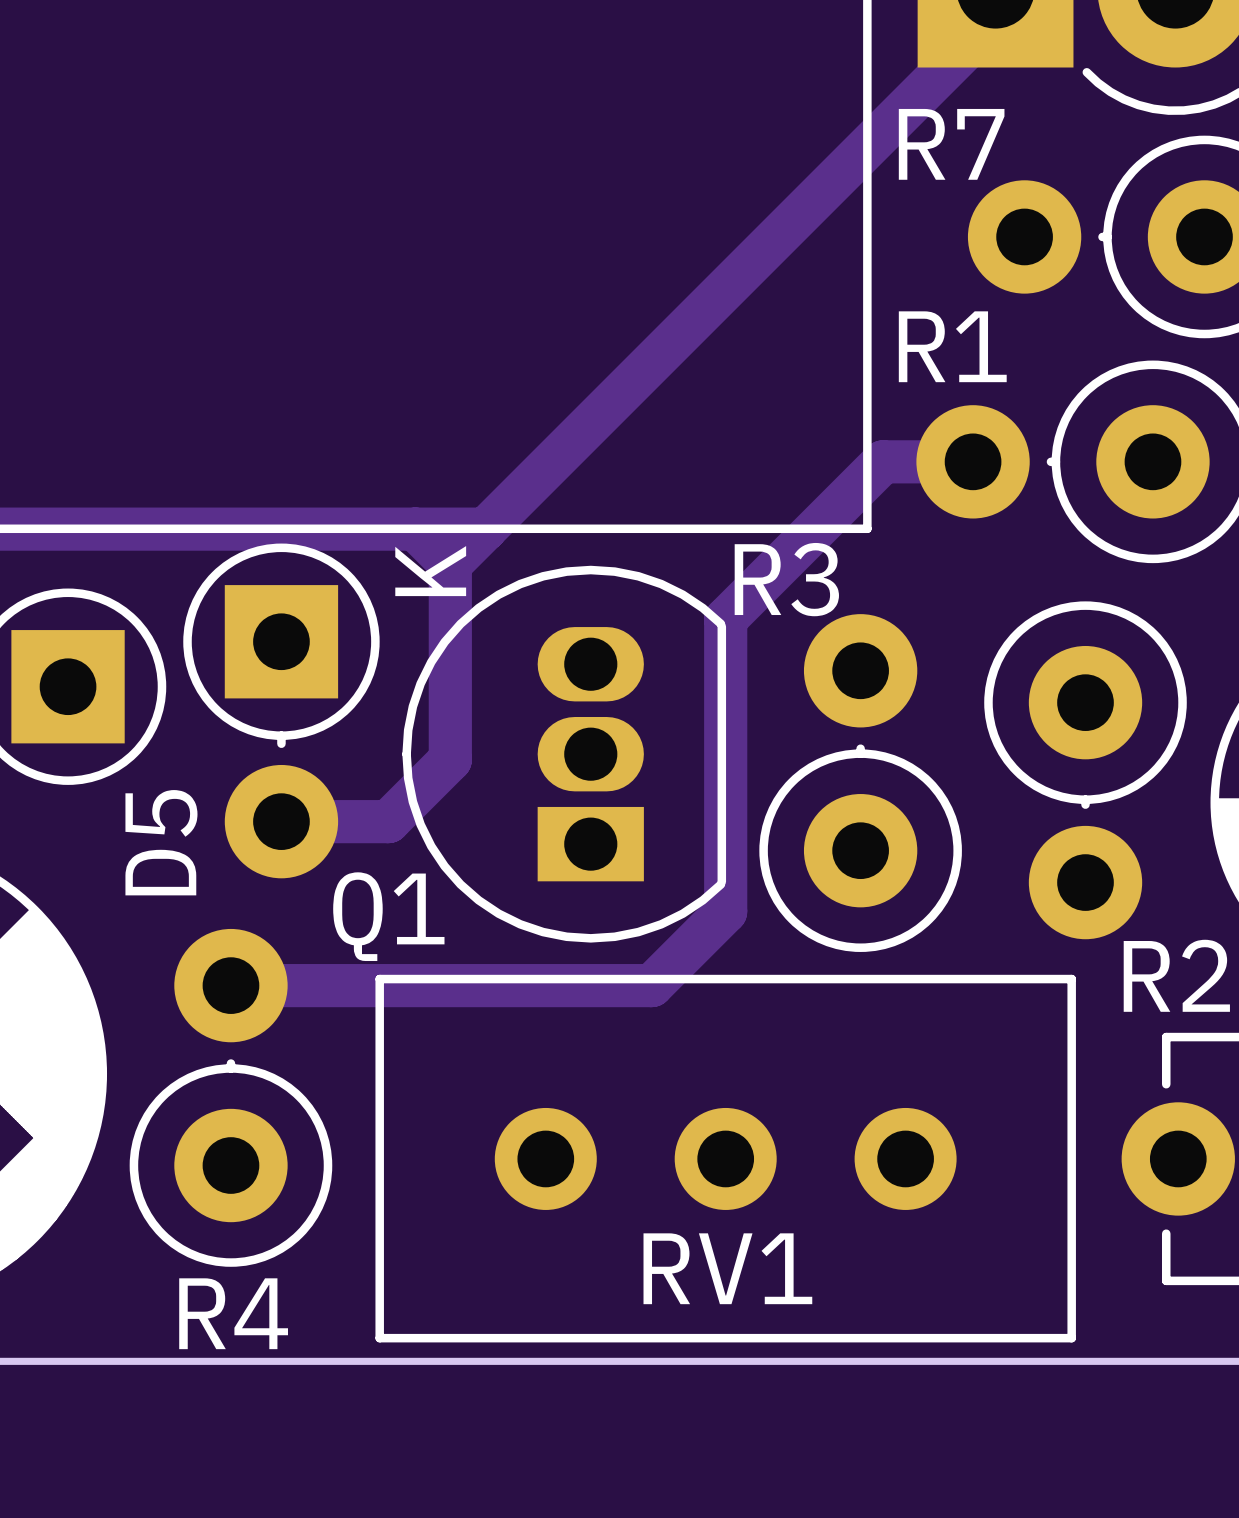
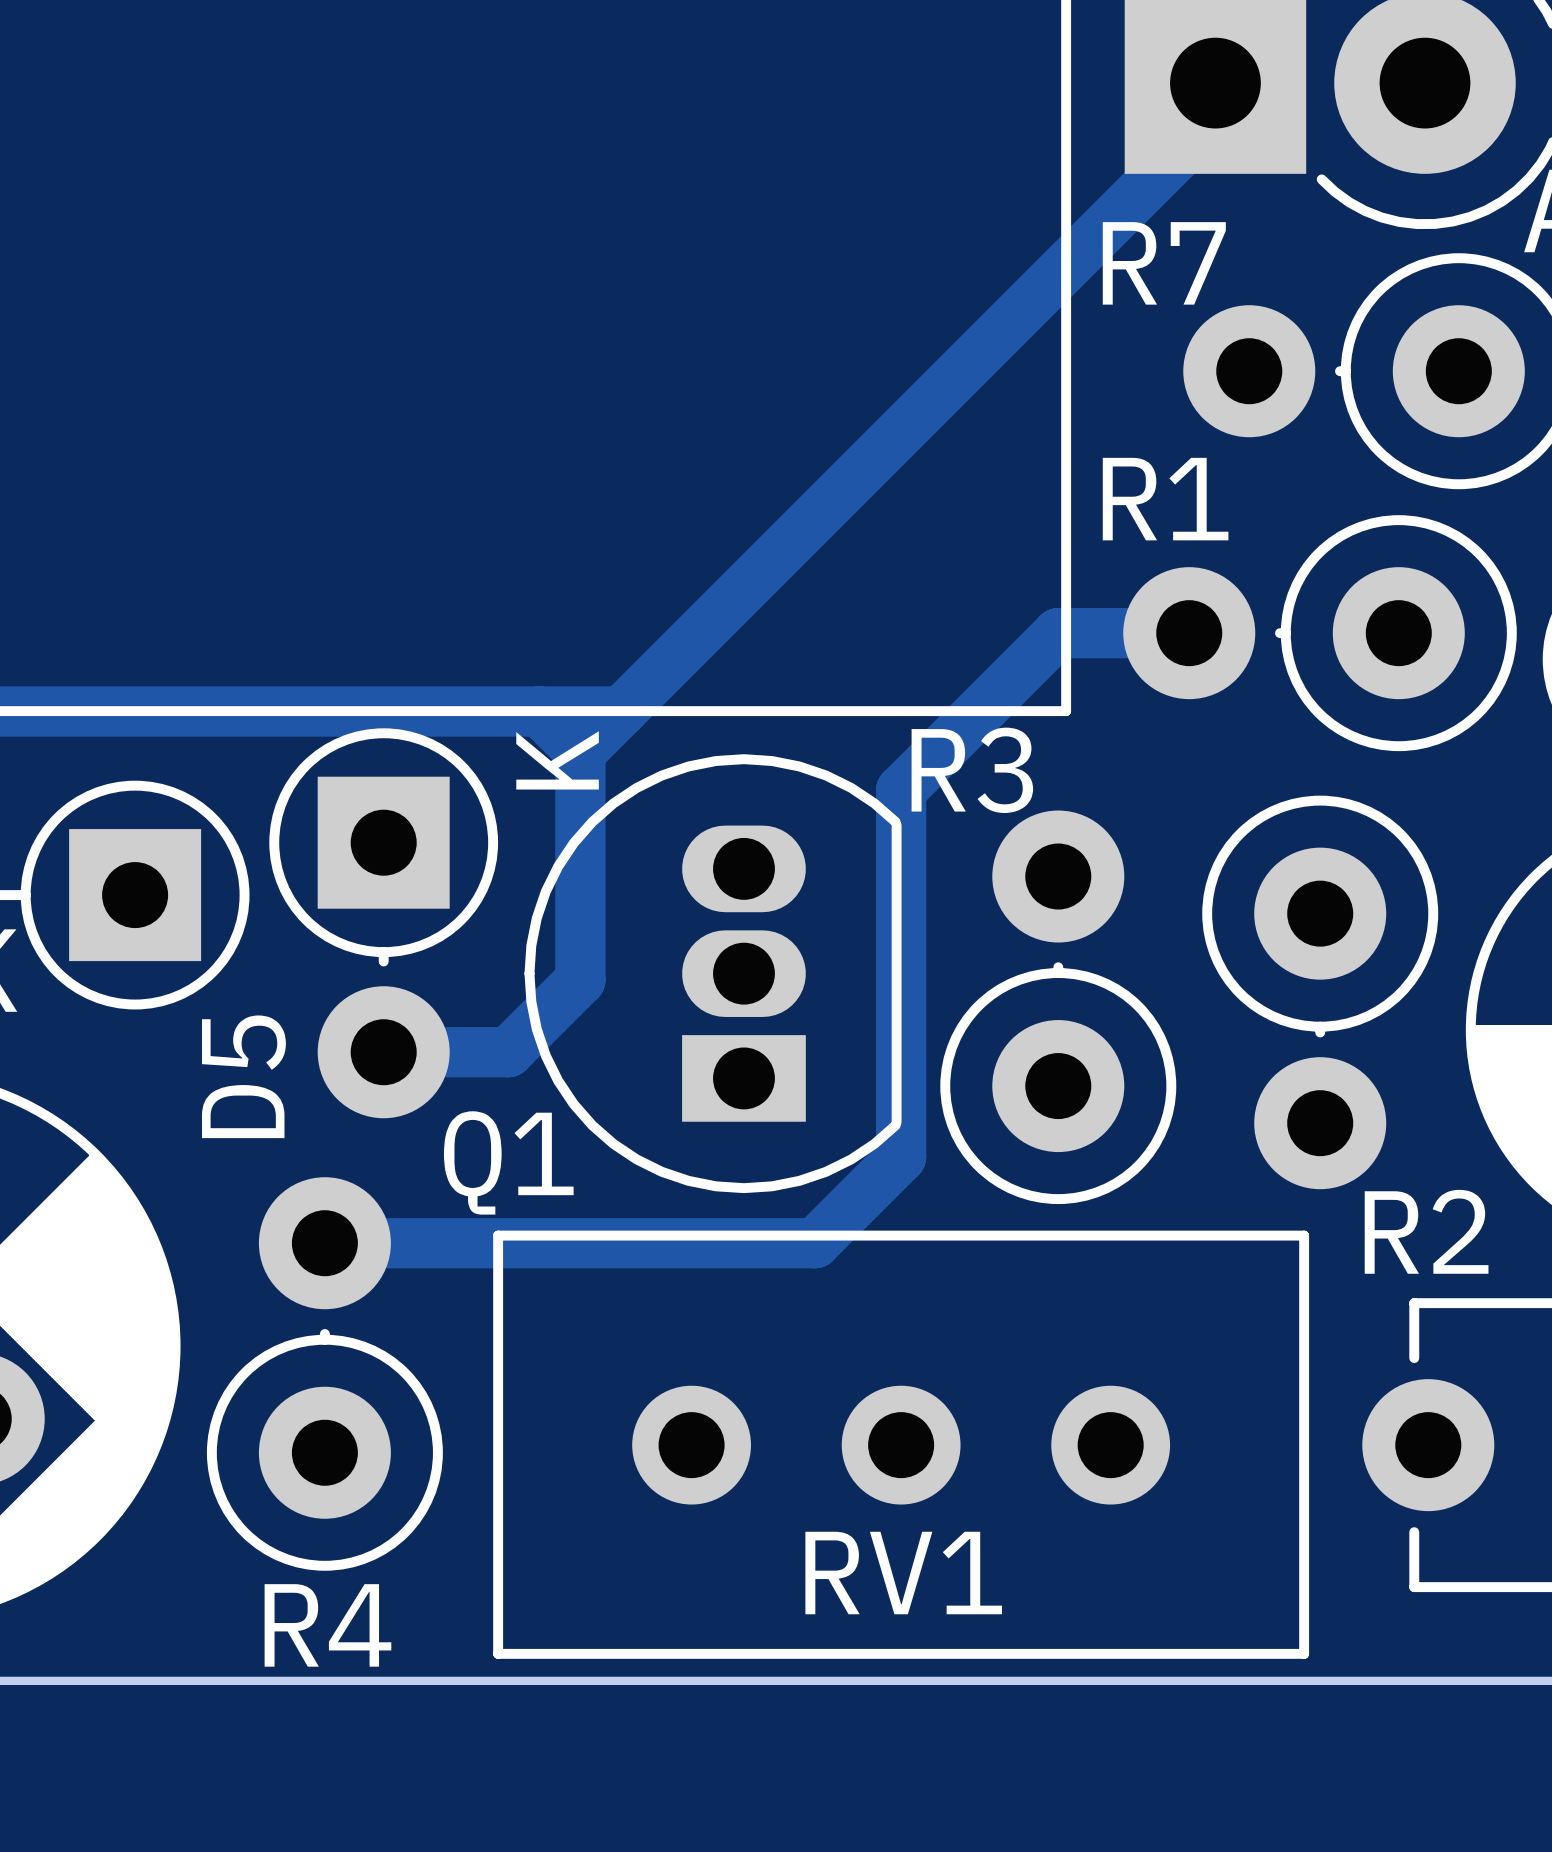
track: (883, 461) (725, 619) -> (1084, 633) (1058, 633) (901, 790) (901, 816)

